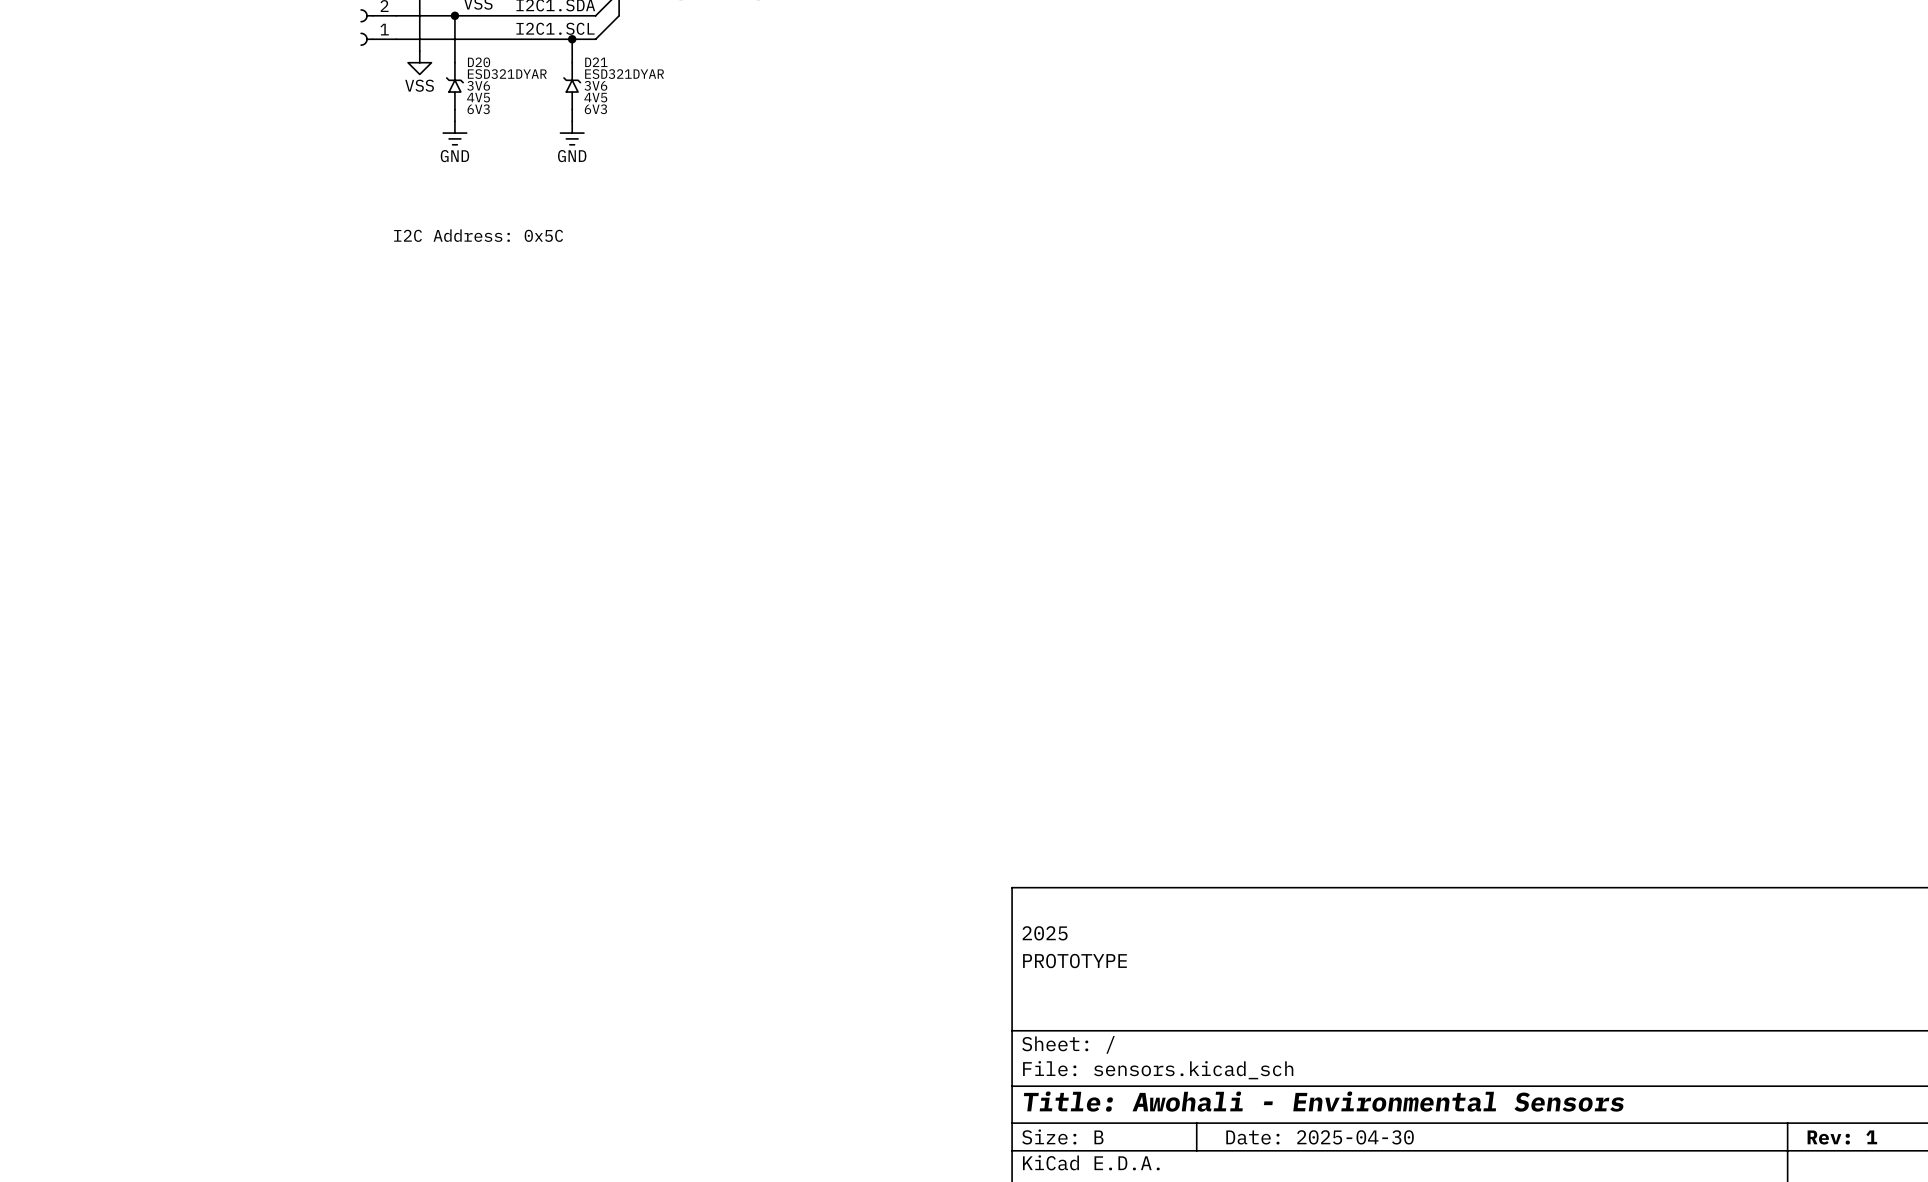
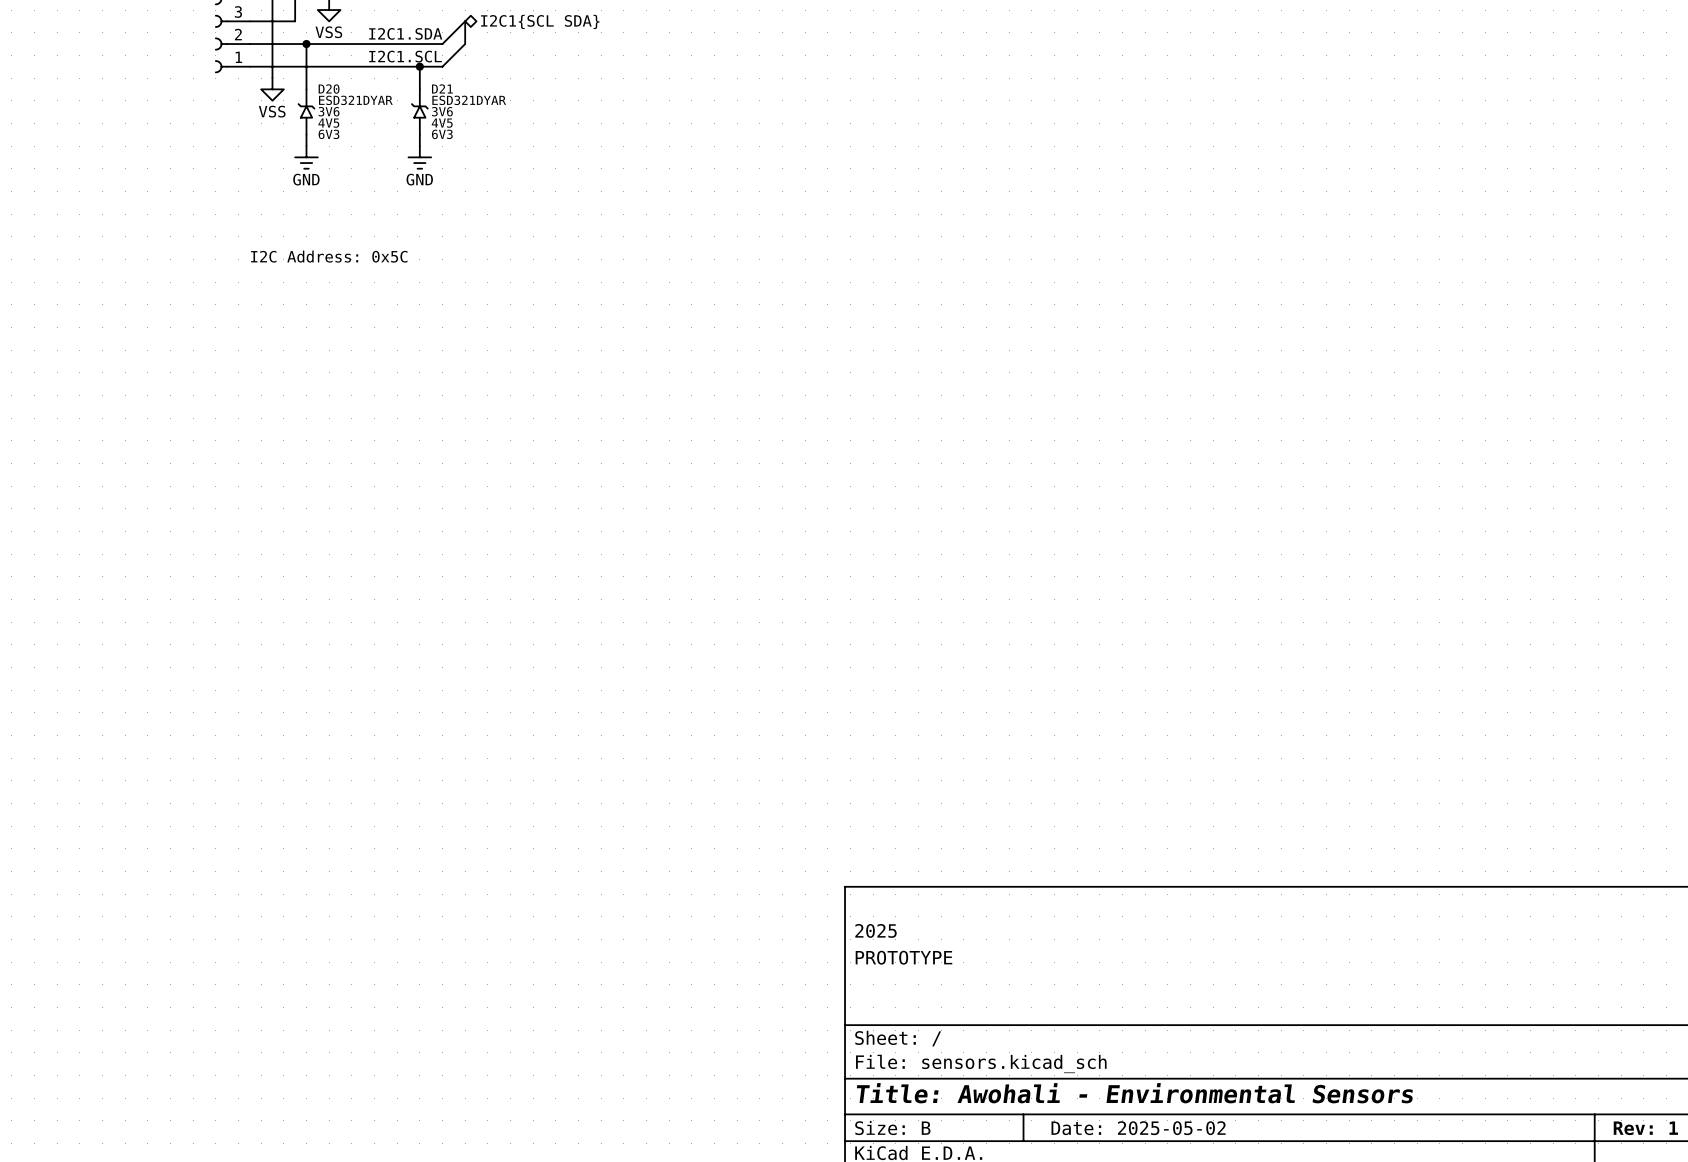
title block: Date: 2025-04-30 (1320, 1137) -> Date: 2025-05-02 (1138, 1128)

